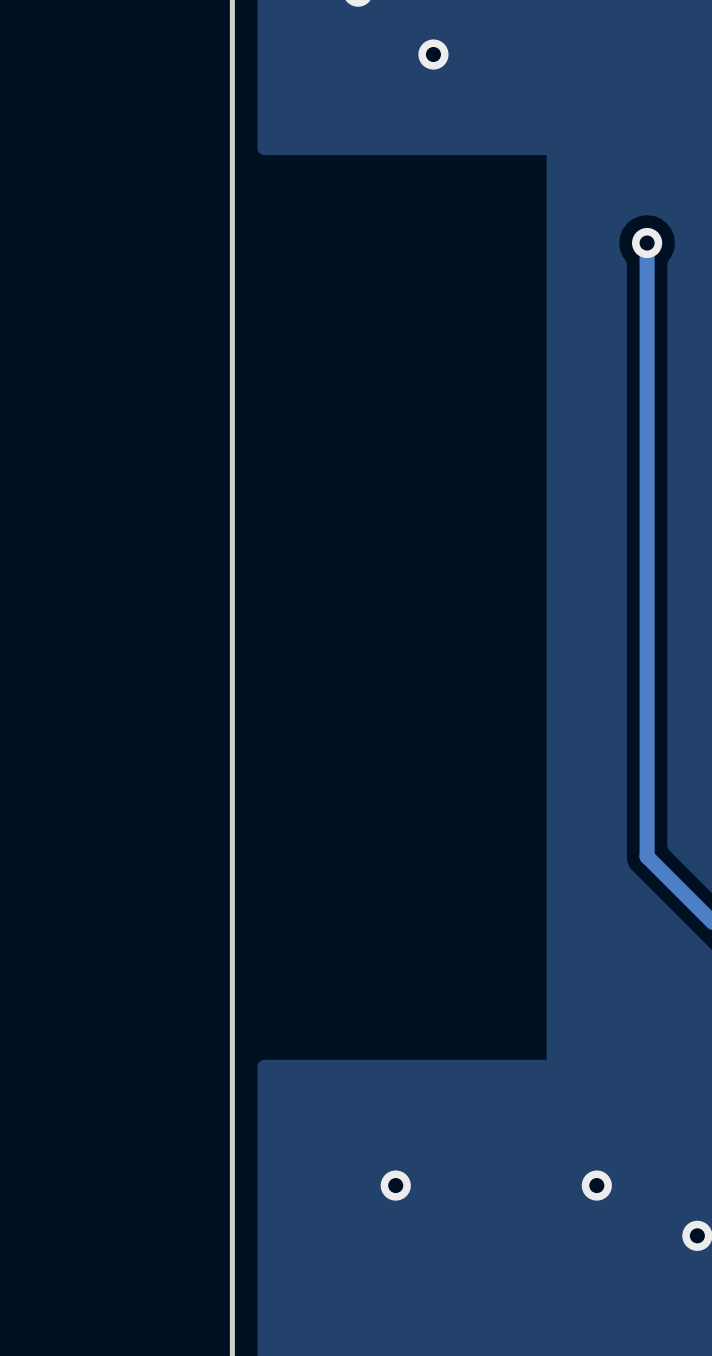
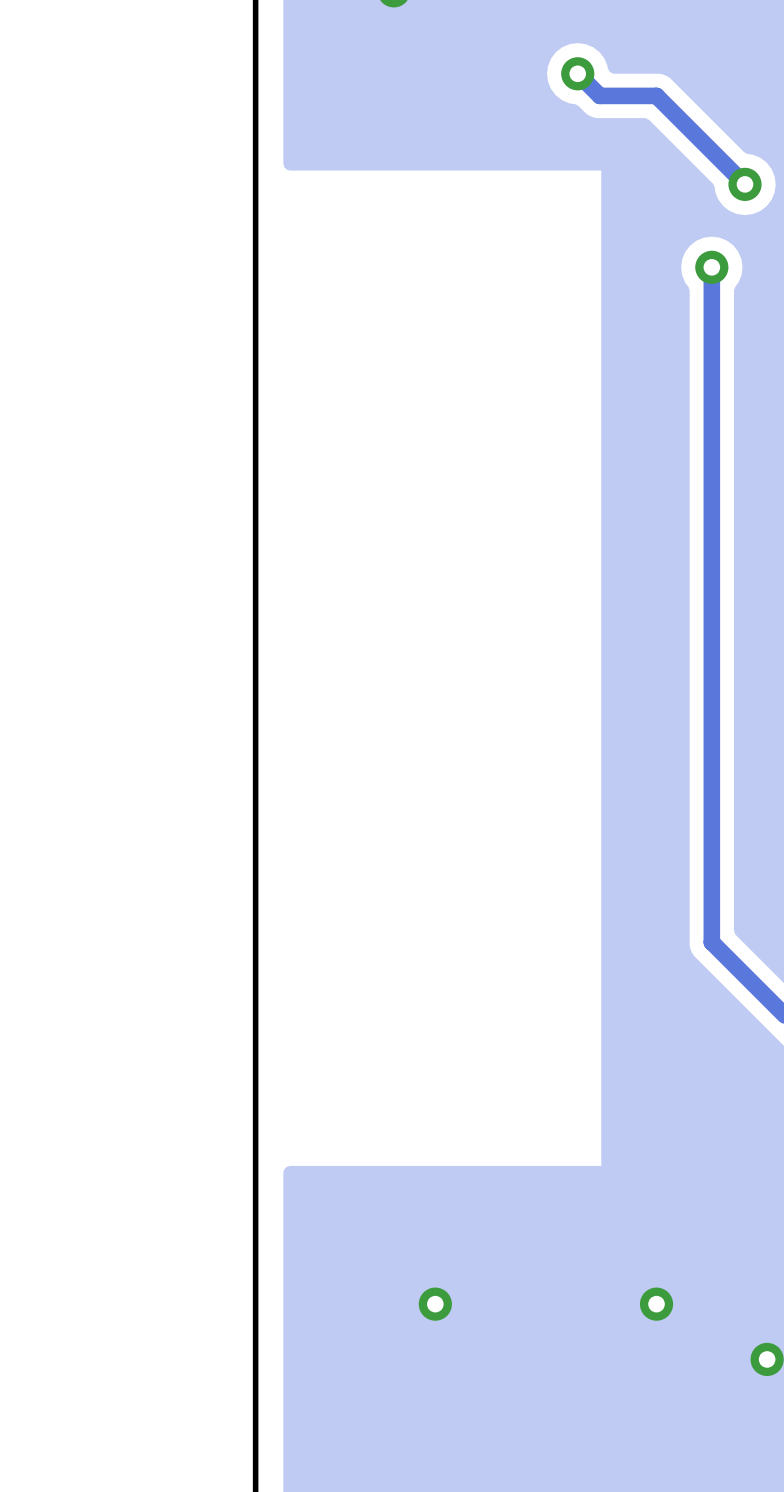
via: (433, 54) -> none
track: none -> (577, 73) (599, 95) (656, 95) (745, 184)
via: none -> (577, 73)
via: none -> (745, 184)

